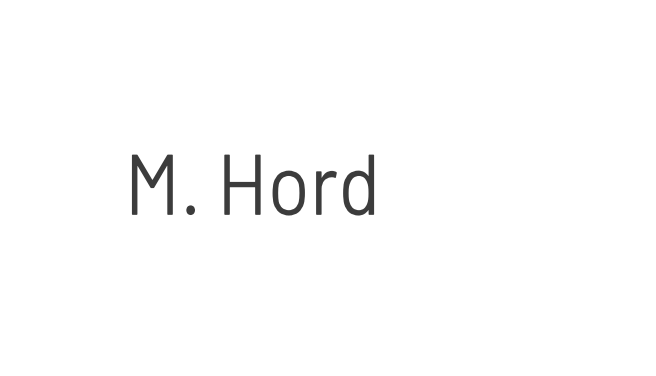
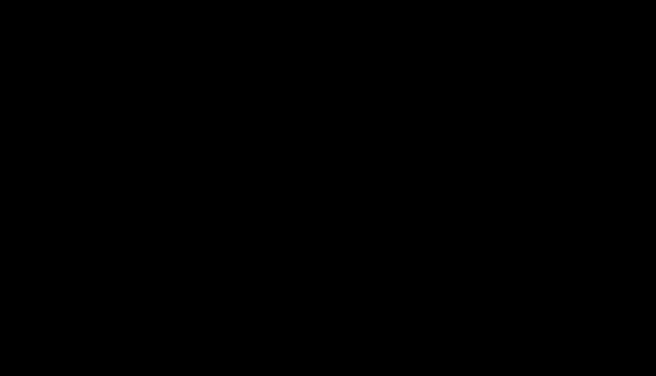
text: M. Hord (253, 185) -> none

